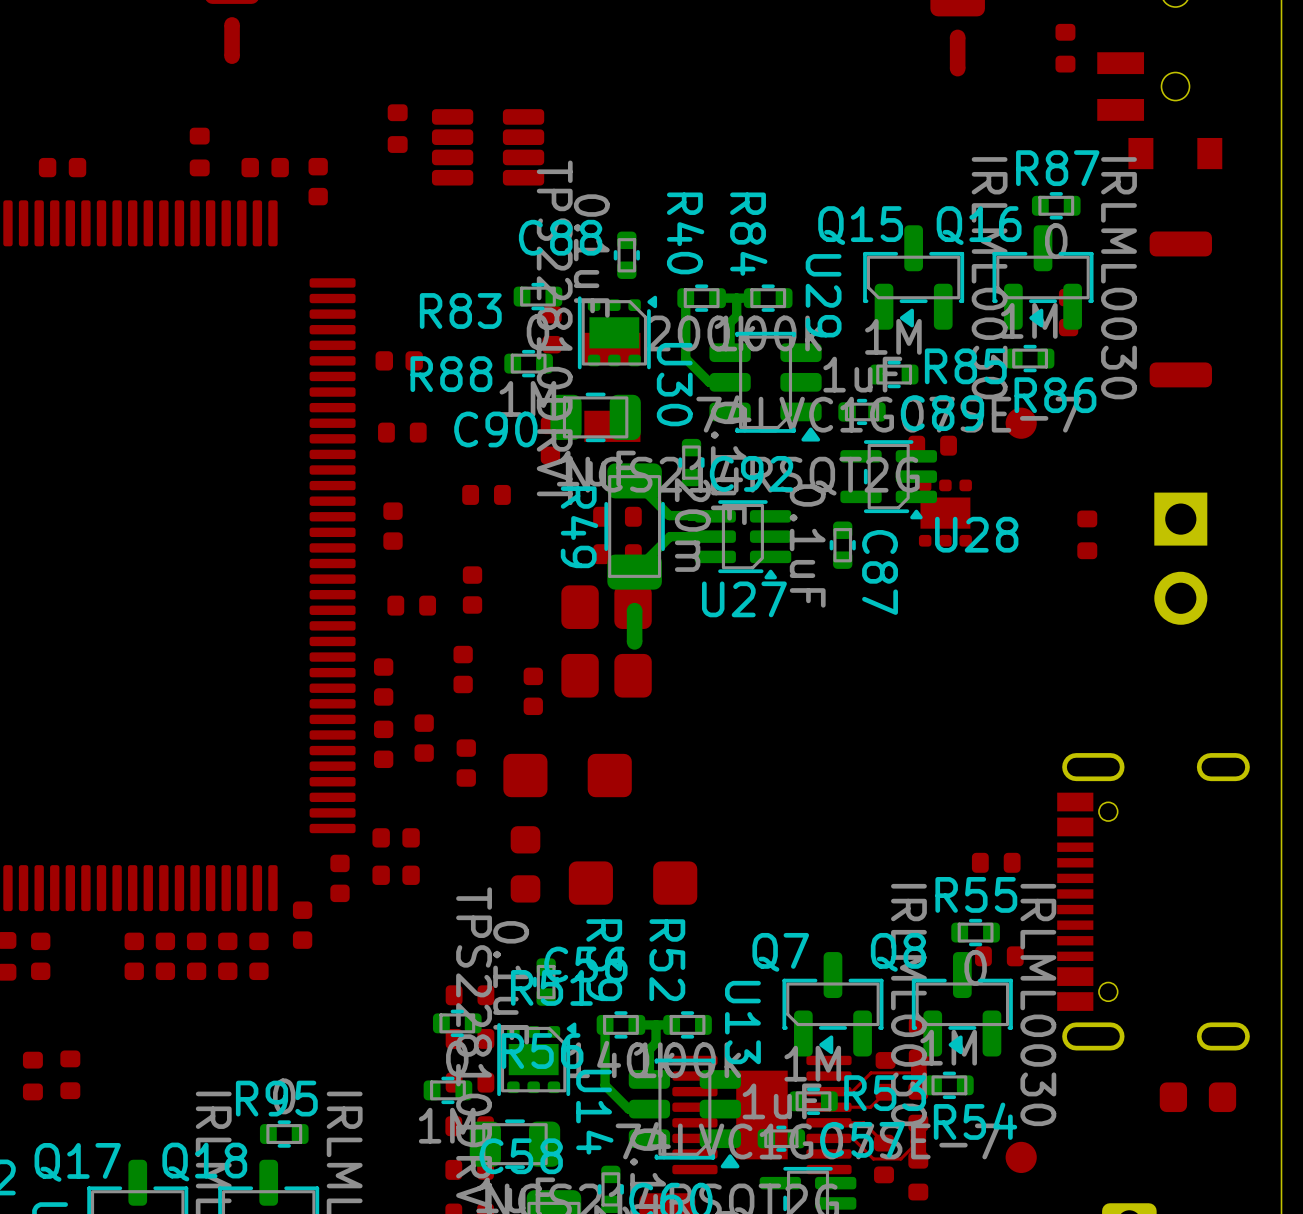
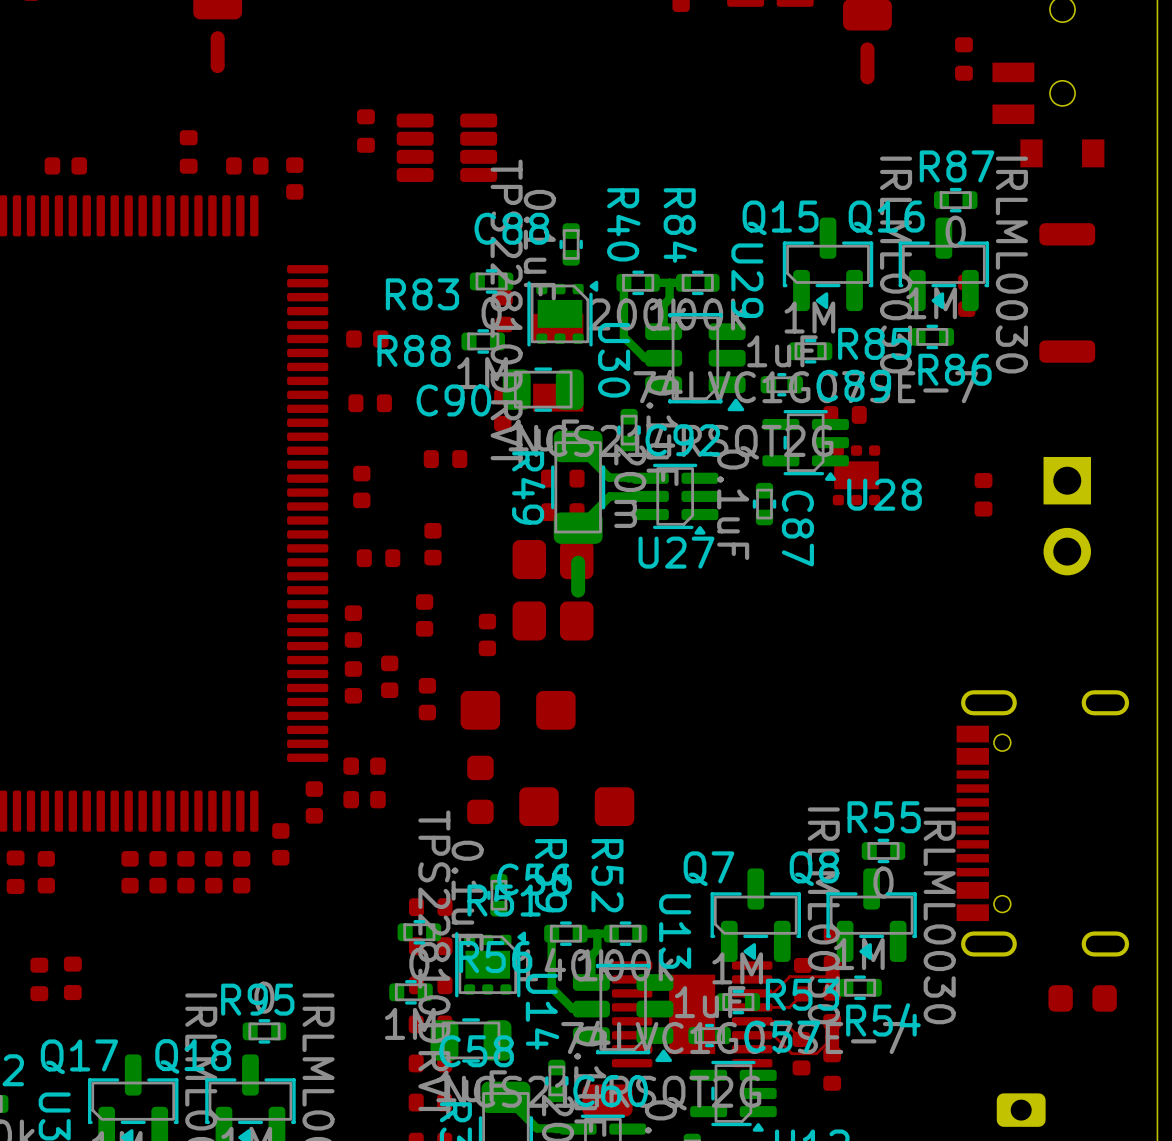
part: (1021, 423) -> none
part: (996, 862) -> none
part: (999, 956) -> none
part: (1021, 1157) -> none

